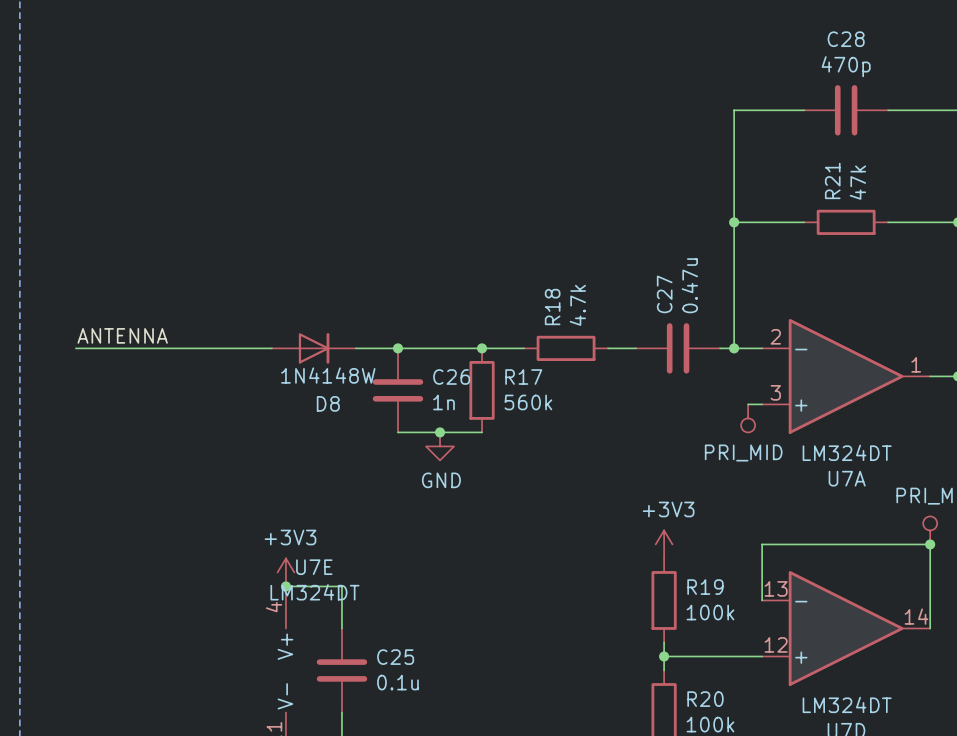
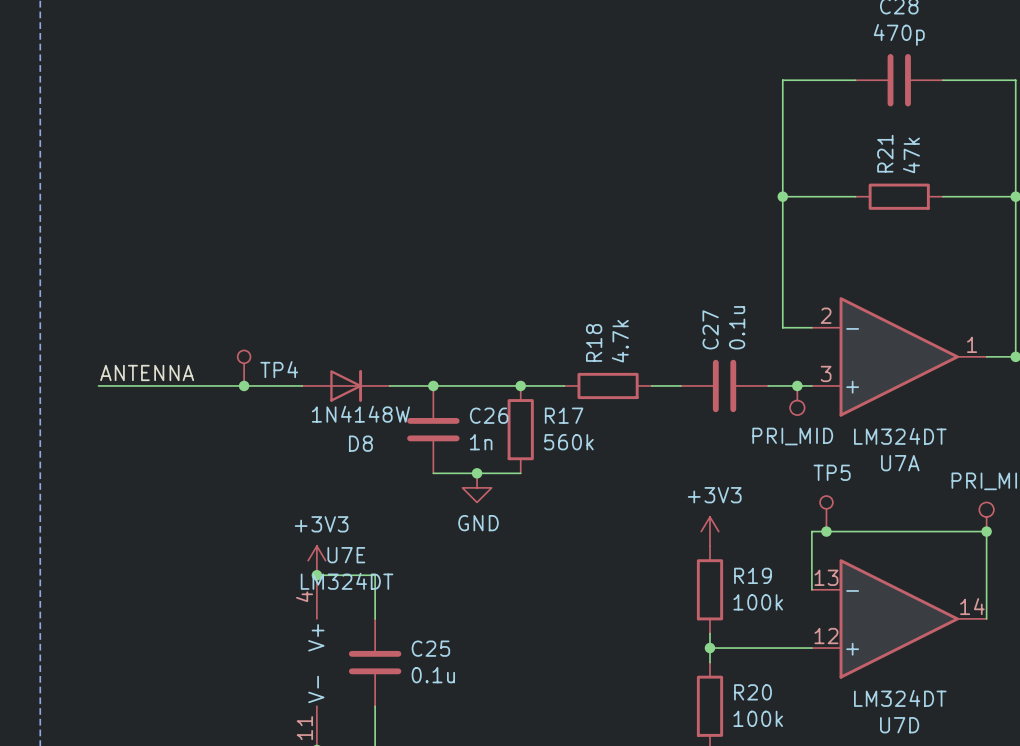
C27 value: 0.47u (689, 285) -> 0.1u (737, 327)
label position: ANTENNA (122, 335) -> ANTENNA (147, 372)
wire: (75, 348) (271, 348) -> (98, 385) (302, 385)
D8 position: (313, 348) -> (346, 385)
wire: (355, 348) (524, 348) -> (389, 385) (564, 385)
junction: (398, 348) -> none
junction: (482, 348) -> none
R18 position: (566, 348) -> (608, 385)
wire: (608, 348) (636, 348) -> (651, 385) (680, 385)
C27 position: (678, 348) -> (724, 385)
wire: (720, 348) (734, 348) -> none
junction position: (734, 348) -> (797, 385)
TP4: none -> (244, 368)
C26 position: (398, 390) -> (433, 429)
R17 position: (482, 390) -> (520, 429)
junction: none -> (244, 385)
junction: none -> (433, 385)
junction: none -> (520, 385)
wire: none -> (768, 385) (797, 385)
wire: (398, 432) (482, 432) -> (433, 473) (520, 473)
junction: (440, 432) -> none
power symbol position: GND (440, 446) -> GND (477, 487)
junction: none -> (477, 473)
TP5: none -> (826, 513)
junction: none -> (826, 531)

